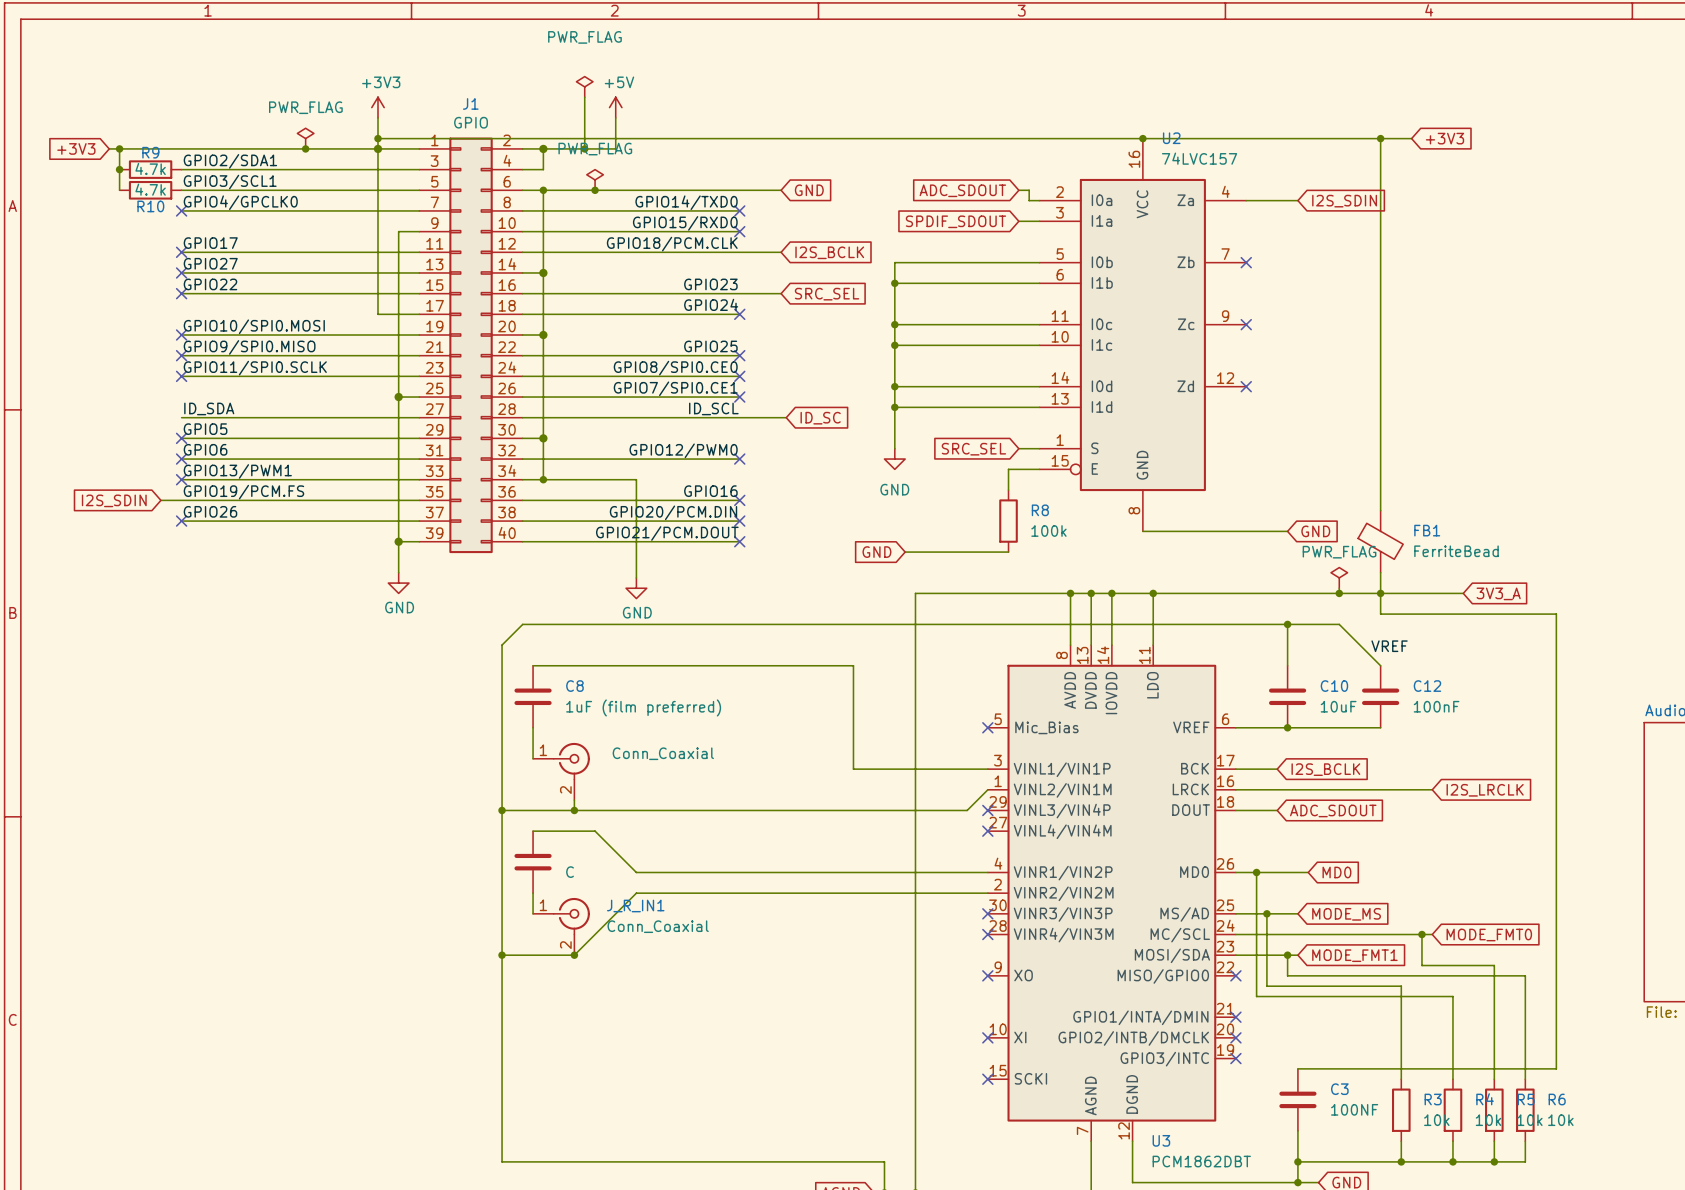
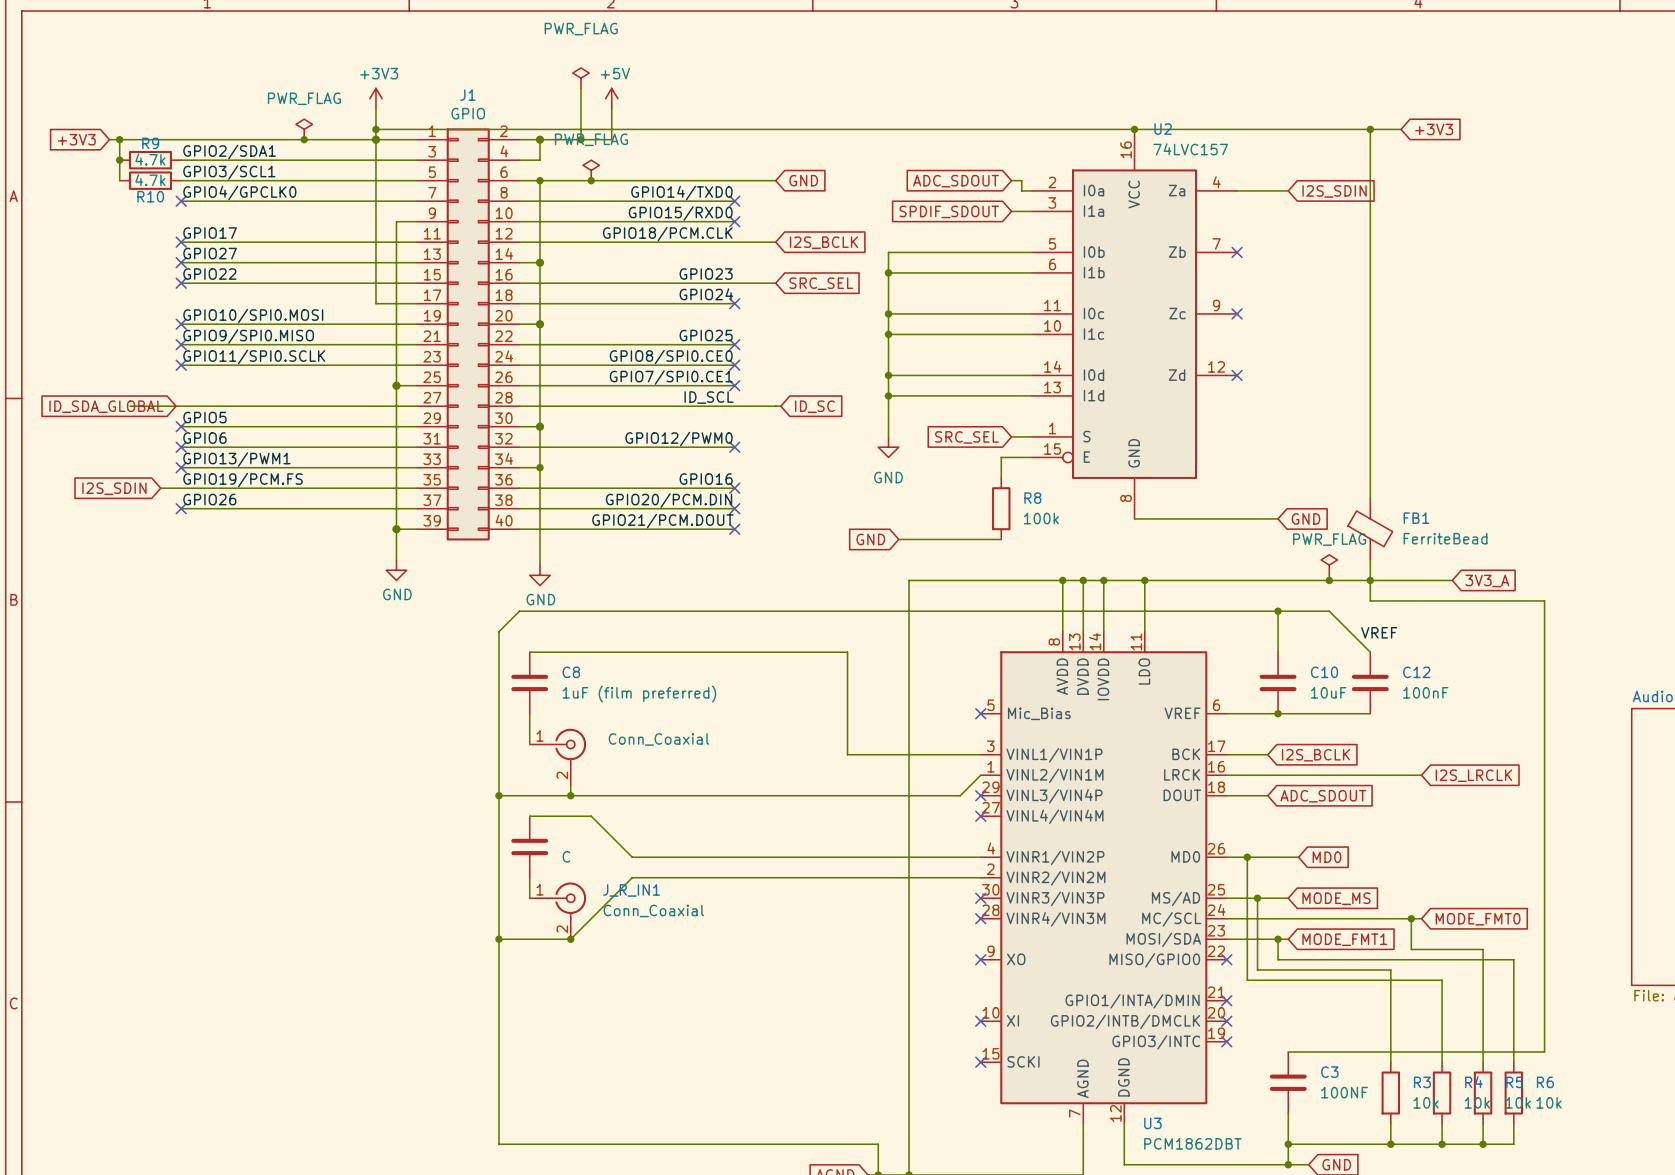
label: ID_SDA (209, 408) -> none
wire: none -> (129, 406) (181, 406)
global label: none -> ID_SDA_GLOBAL (106, 406)
wire: (543, 479) (636, 479) (636, 577) -> (539, 467) (539, 565)
power symbol position: GND (636, 588) -> GND (539, 575)

